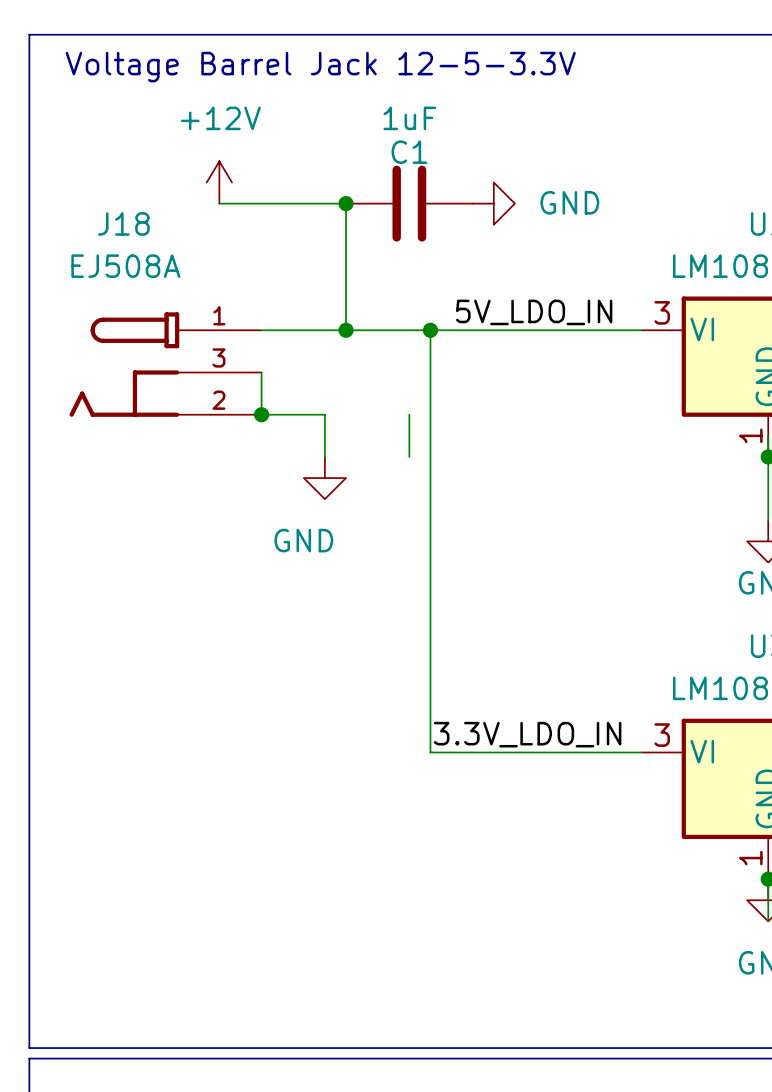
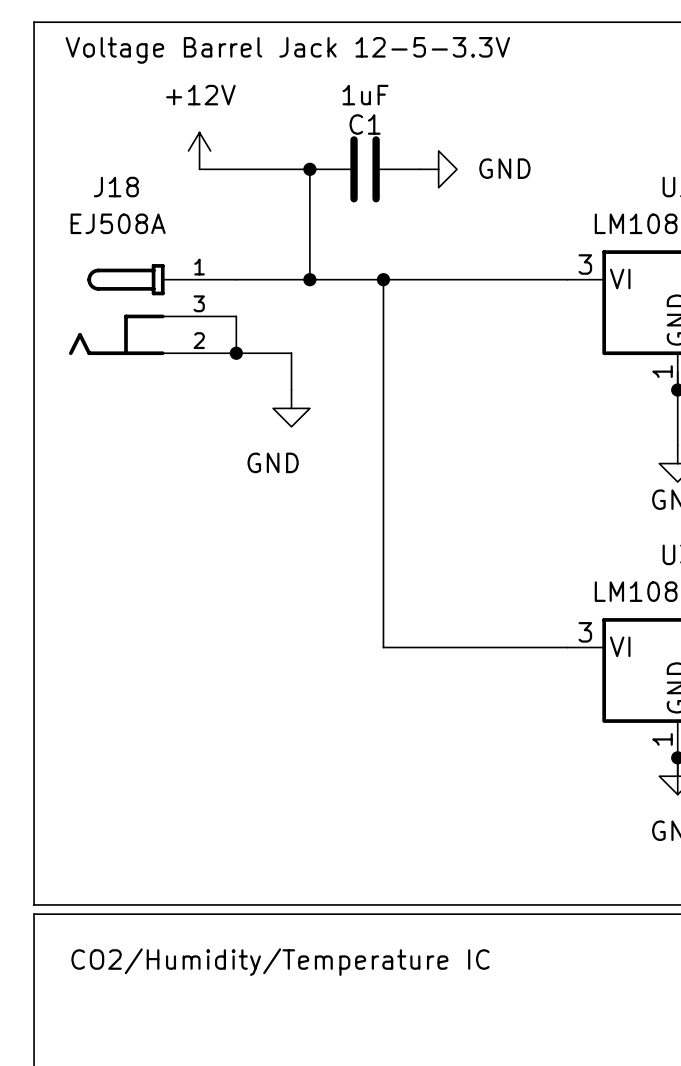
label: 5V_LDO_IN (534, 312) -> none
wire: (409, 414) (409, 456) -> none
label: 3.3V_LDO_IN (527, 734) -> none

